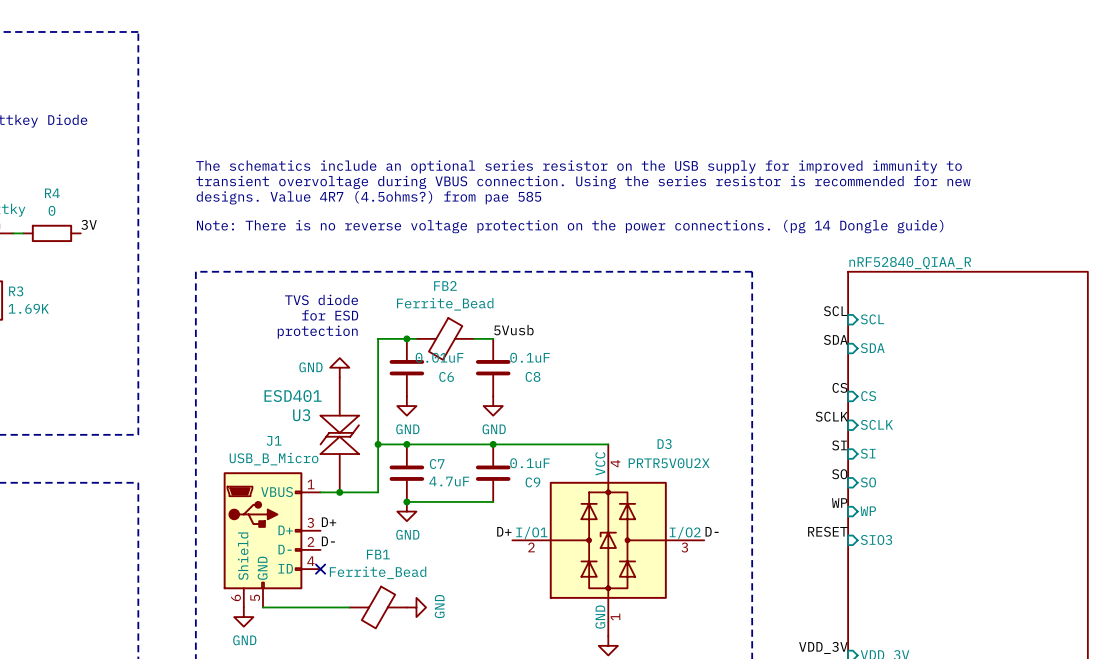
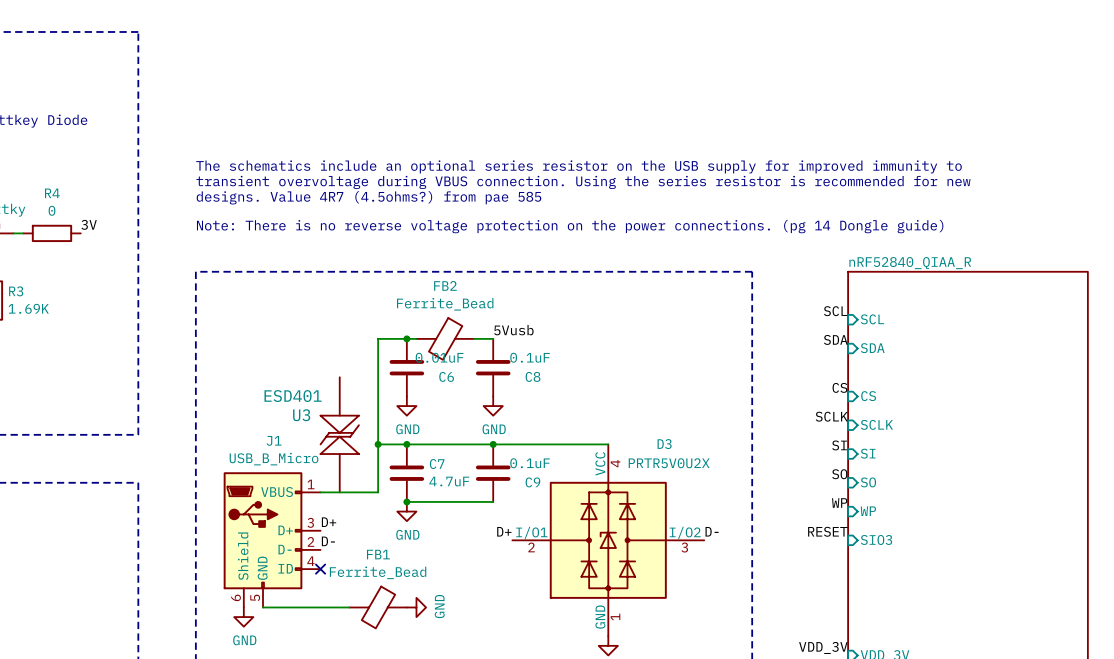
text: TVS diode (321, 299) -> none
text: for ESD (330, 315) -> none
text: protection (317, 332) -> none
power symbol: GND (339, 367) -> none
junction: (339, 492) -> none

